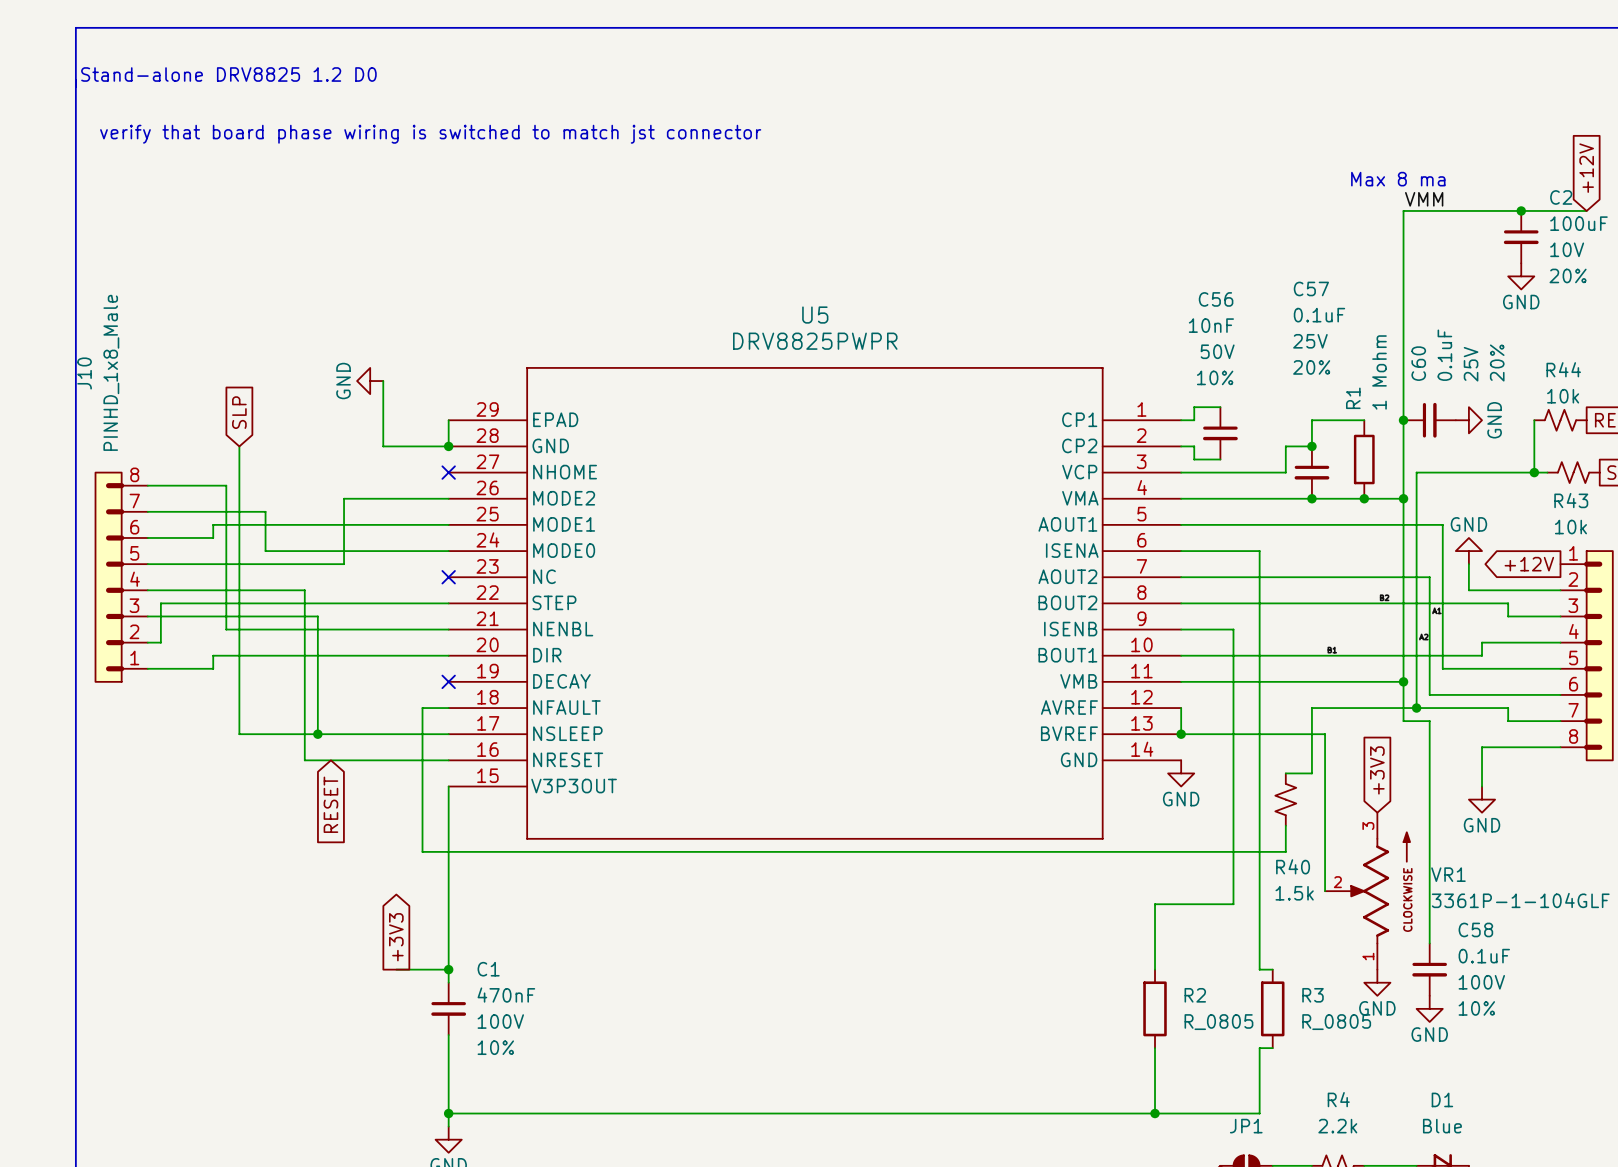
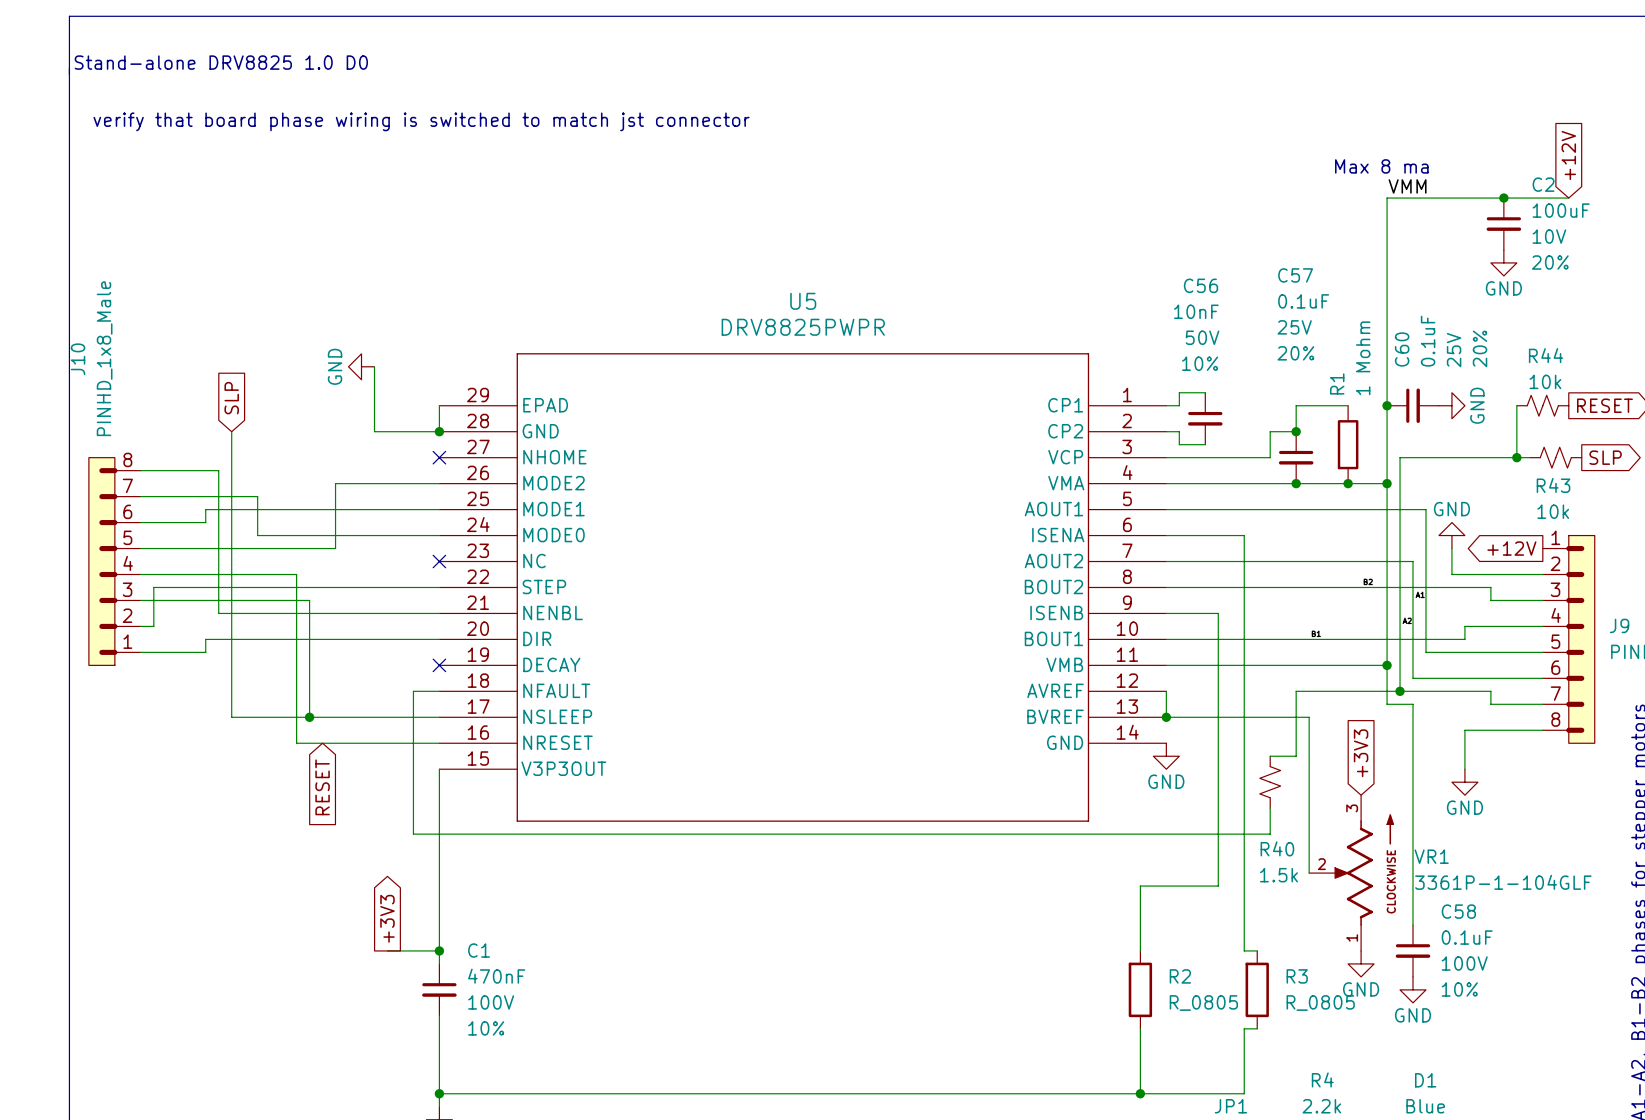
text: Stand-alone DRV8825 1.2 D0 (228, 74) -> Stand-alone DRV8825 1.0 D0 (221, 62)

